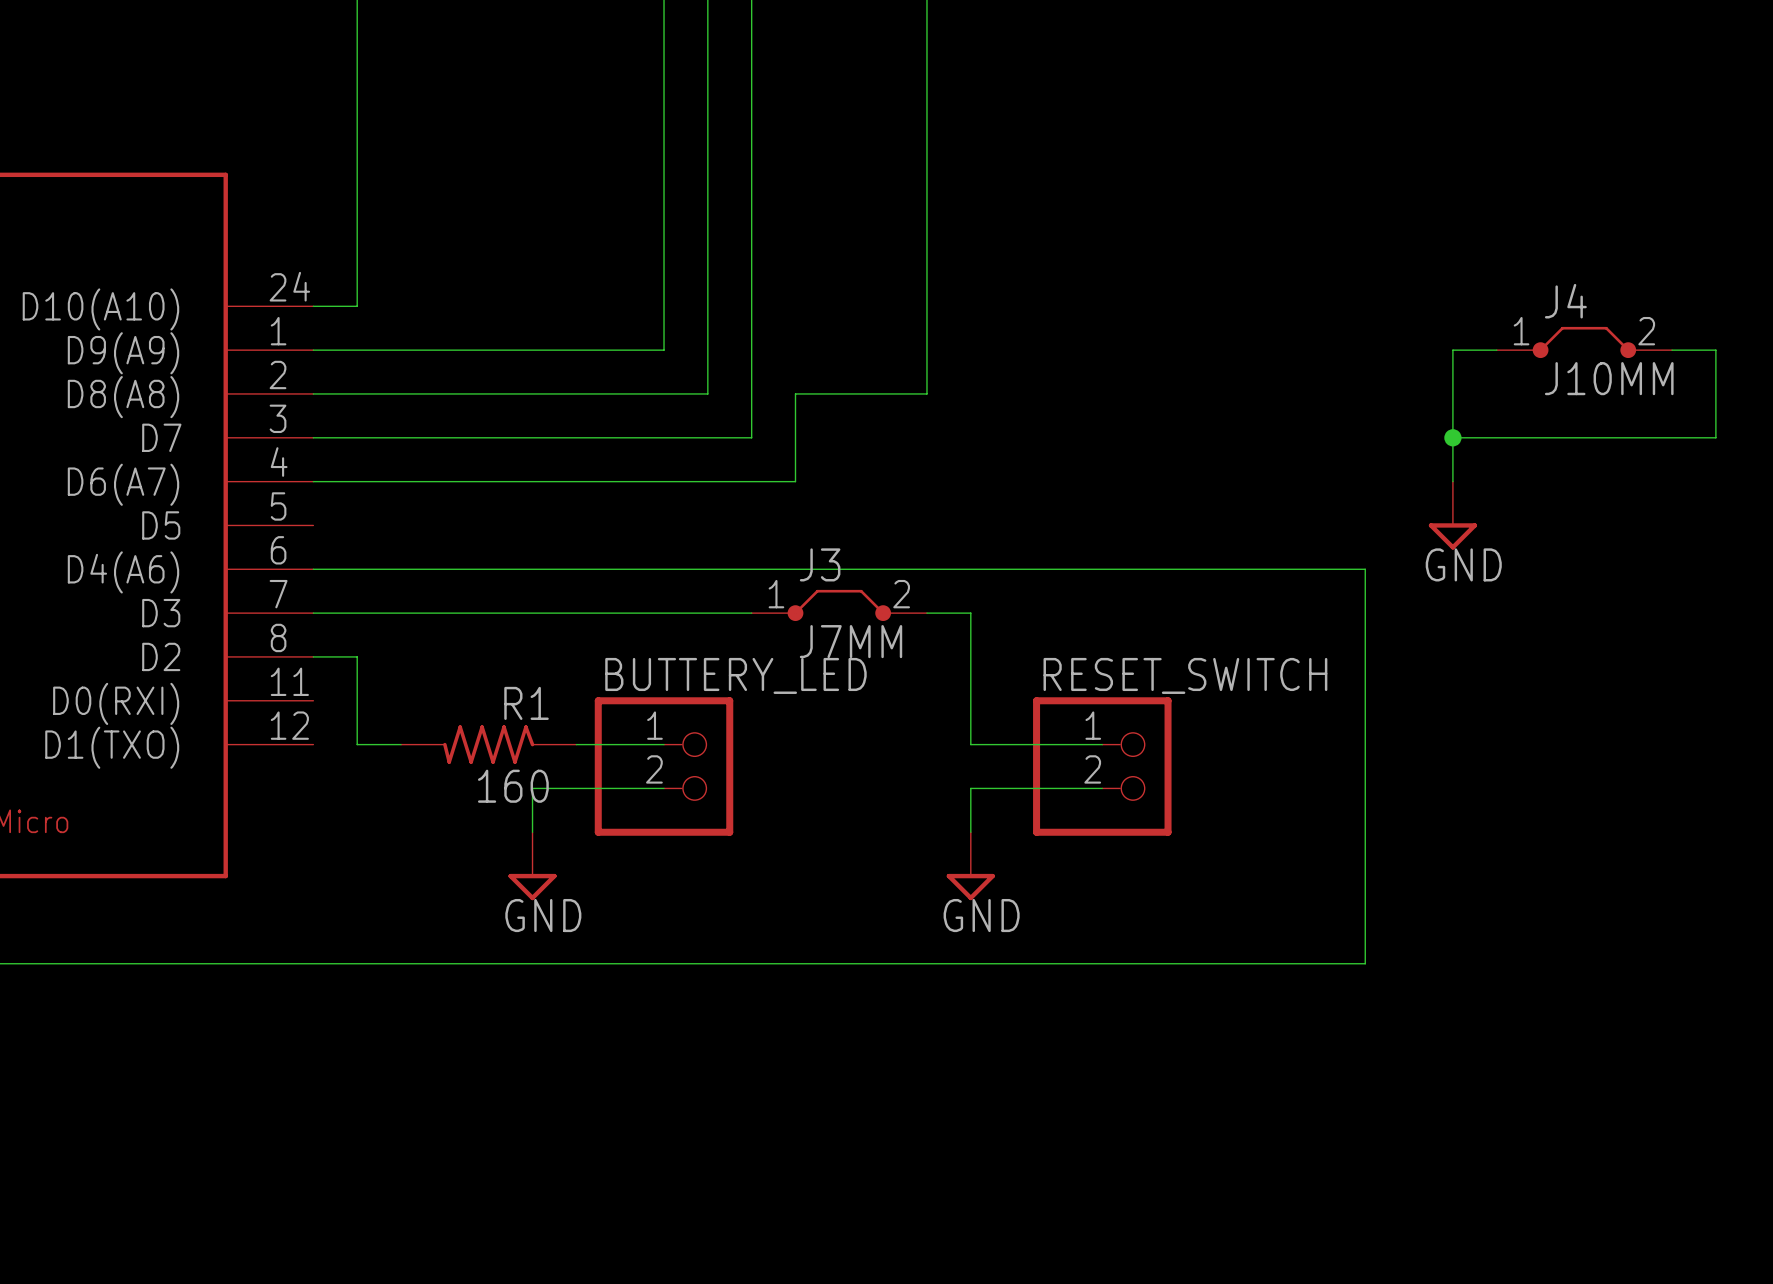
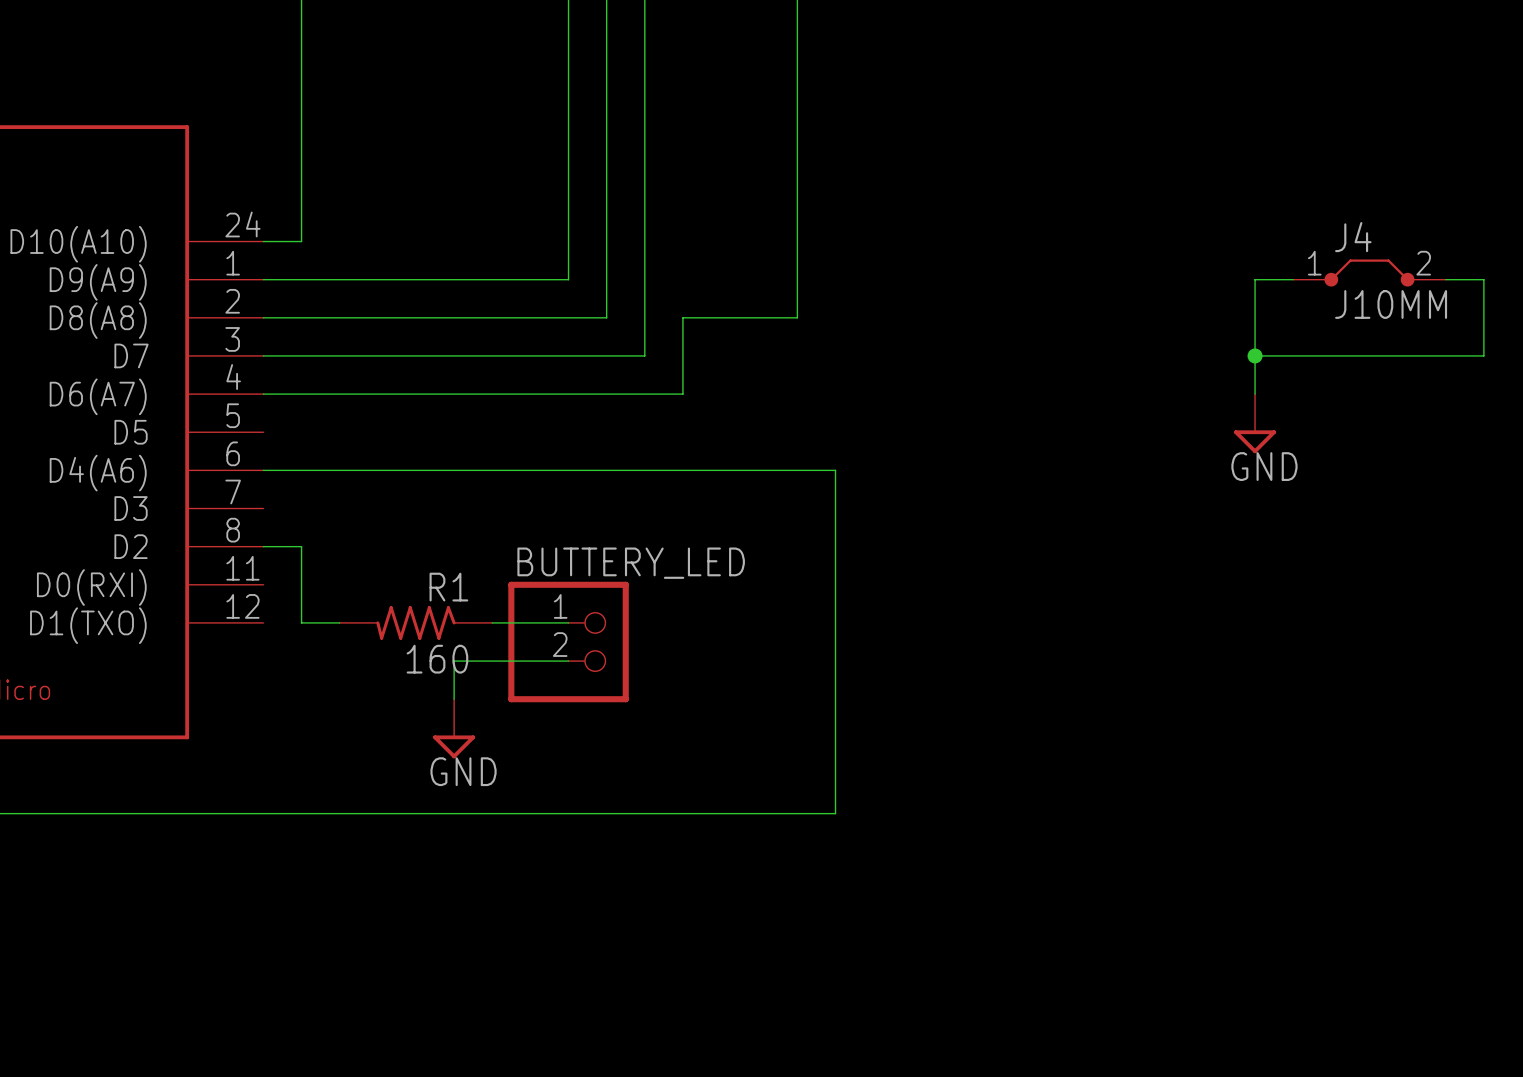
wire: (970, 569) (1365, 569) (1365, 963) (970, 963) -> (835, 699) (835, 813)
J3: J7MM (839, 605) -> none
wire: (313, 613) (751, 613) -> none
wire: (926, 613) (970, 613) -> (835, 470) (835, 508)
wire: (970, 744) (1102, 744) -> (835, 622) (835, 661)
RESET_SWITCH: (1102, 766) -> none
wire: (970, 788) (1102, 788) -> none
power symbol: GND (970, 866) -> none

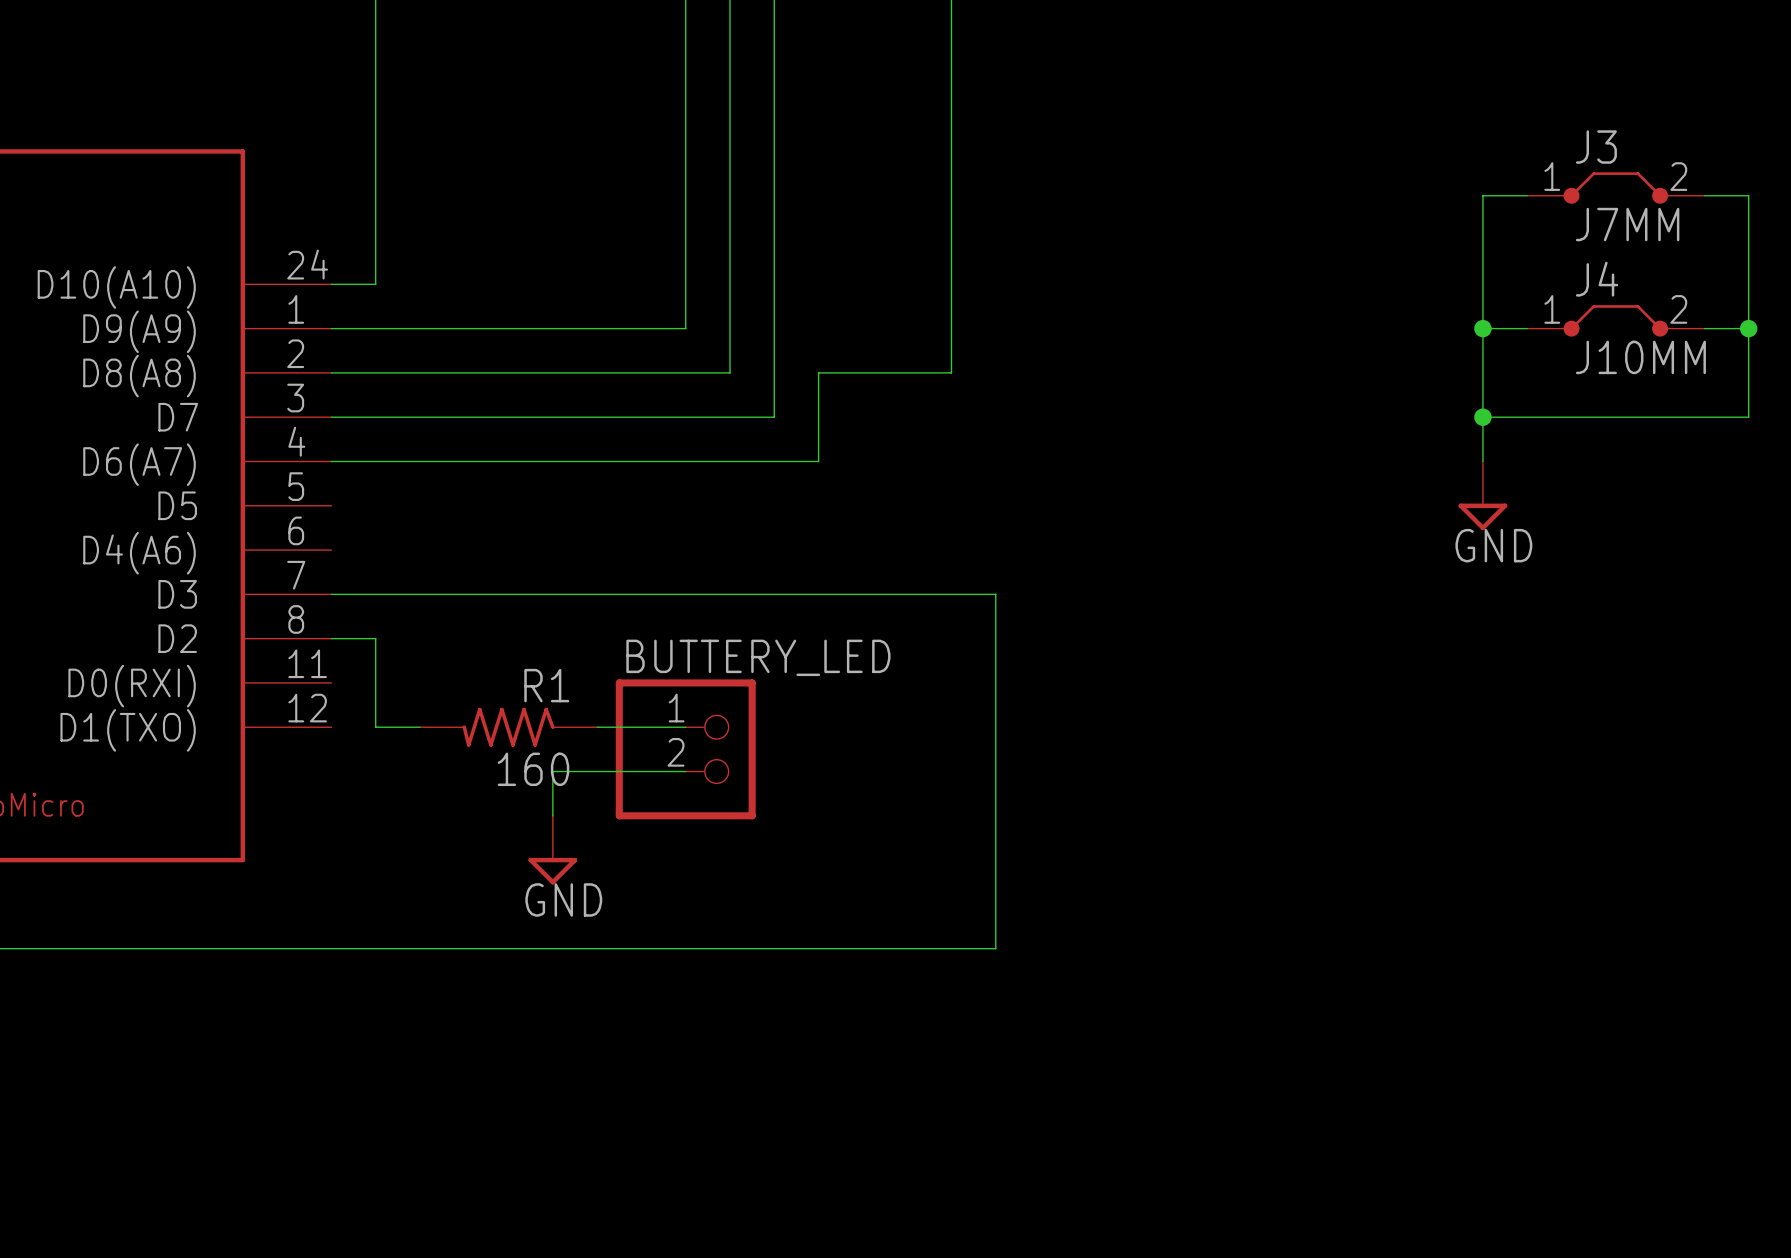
J3: none -> J7MM (1615, 188)
wire: none -> (1527, 195) (1482, 195) (1482, 328)
wire: none -> (1704, 195) (1748, 195) (1748, 328)
junction: none -> (1482, 328)
junction: none -> (1748, 328)
wire: (263, 470) (835, 470) (835, 508) -> (331, 594) (995, 594)

